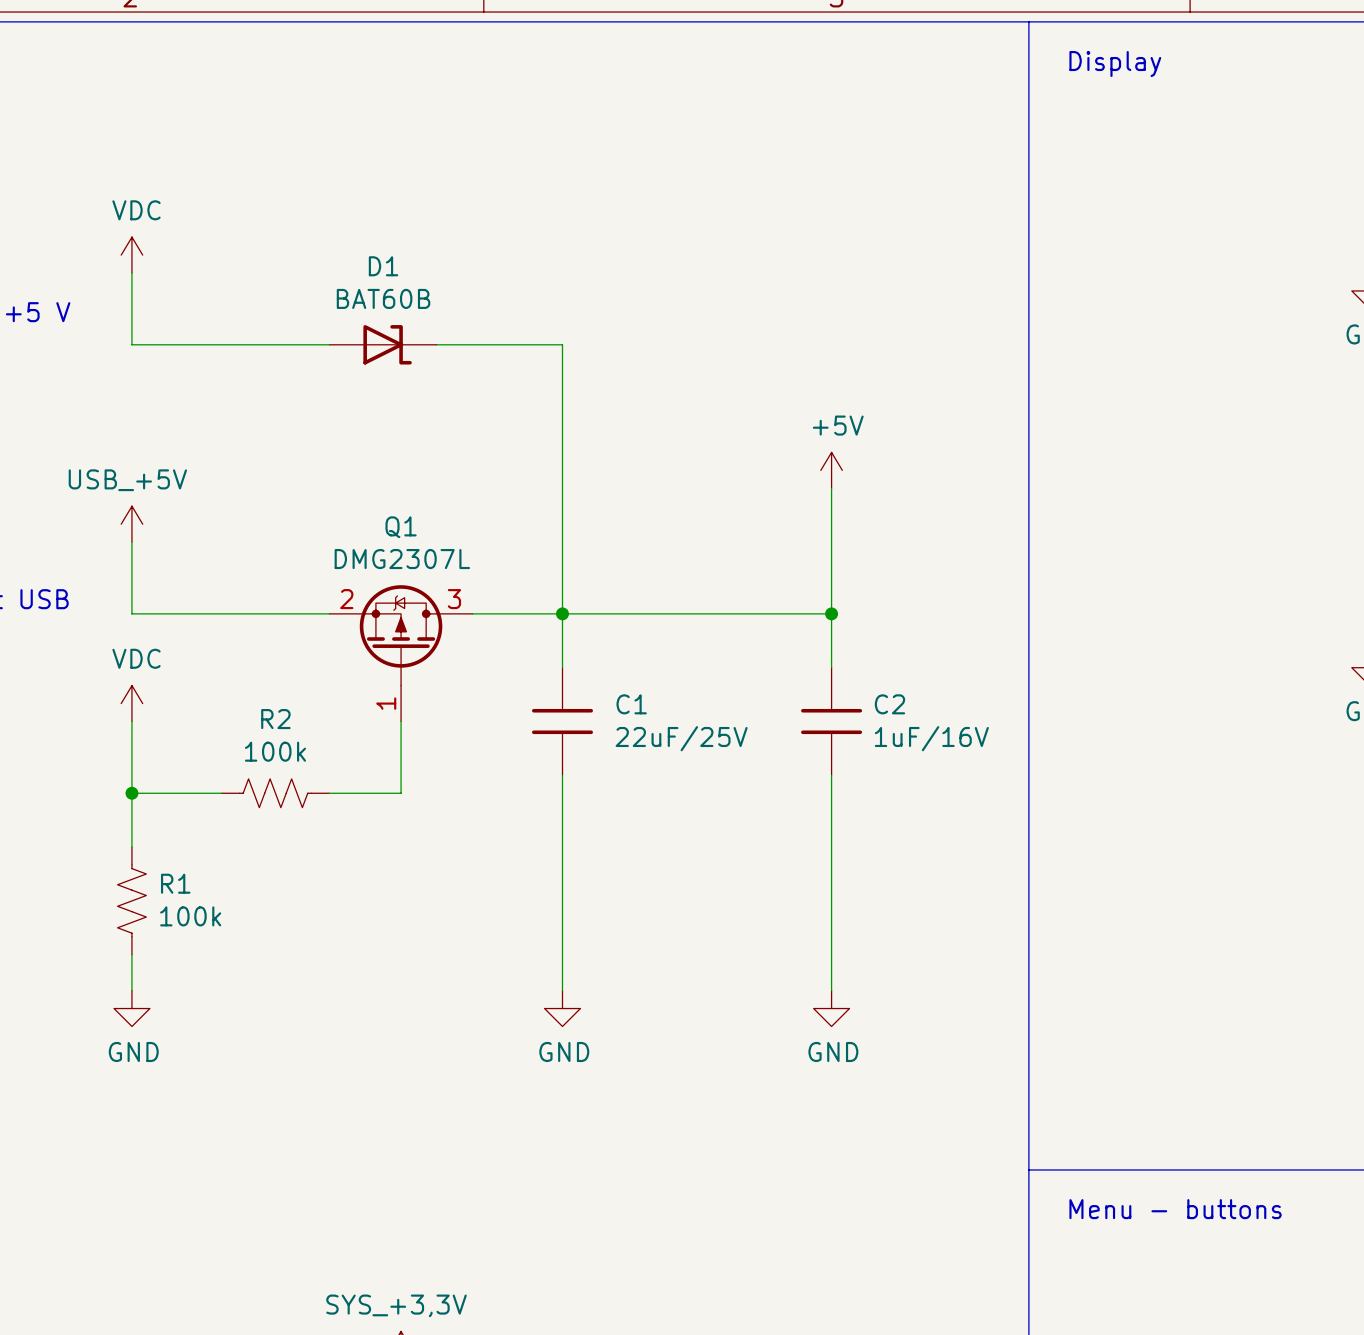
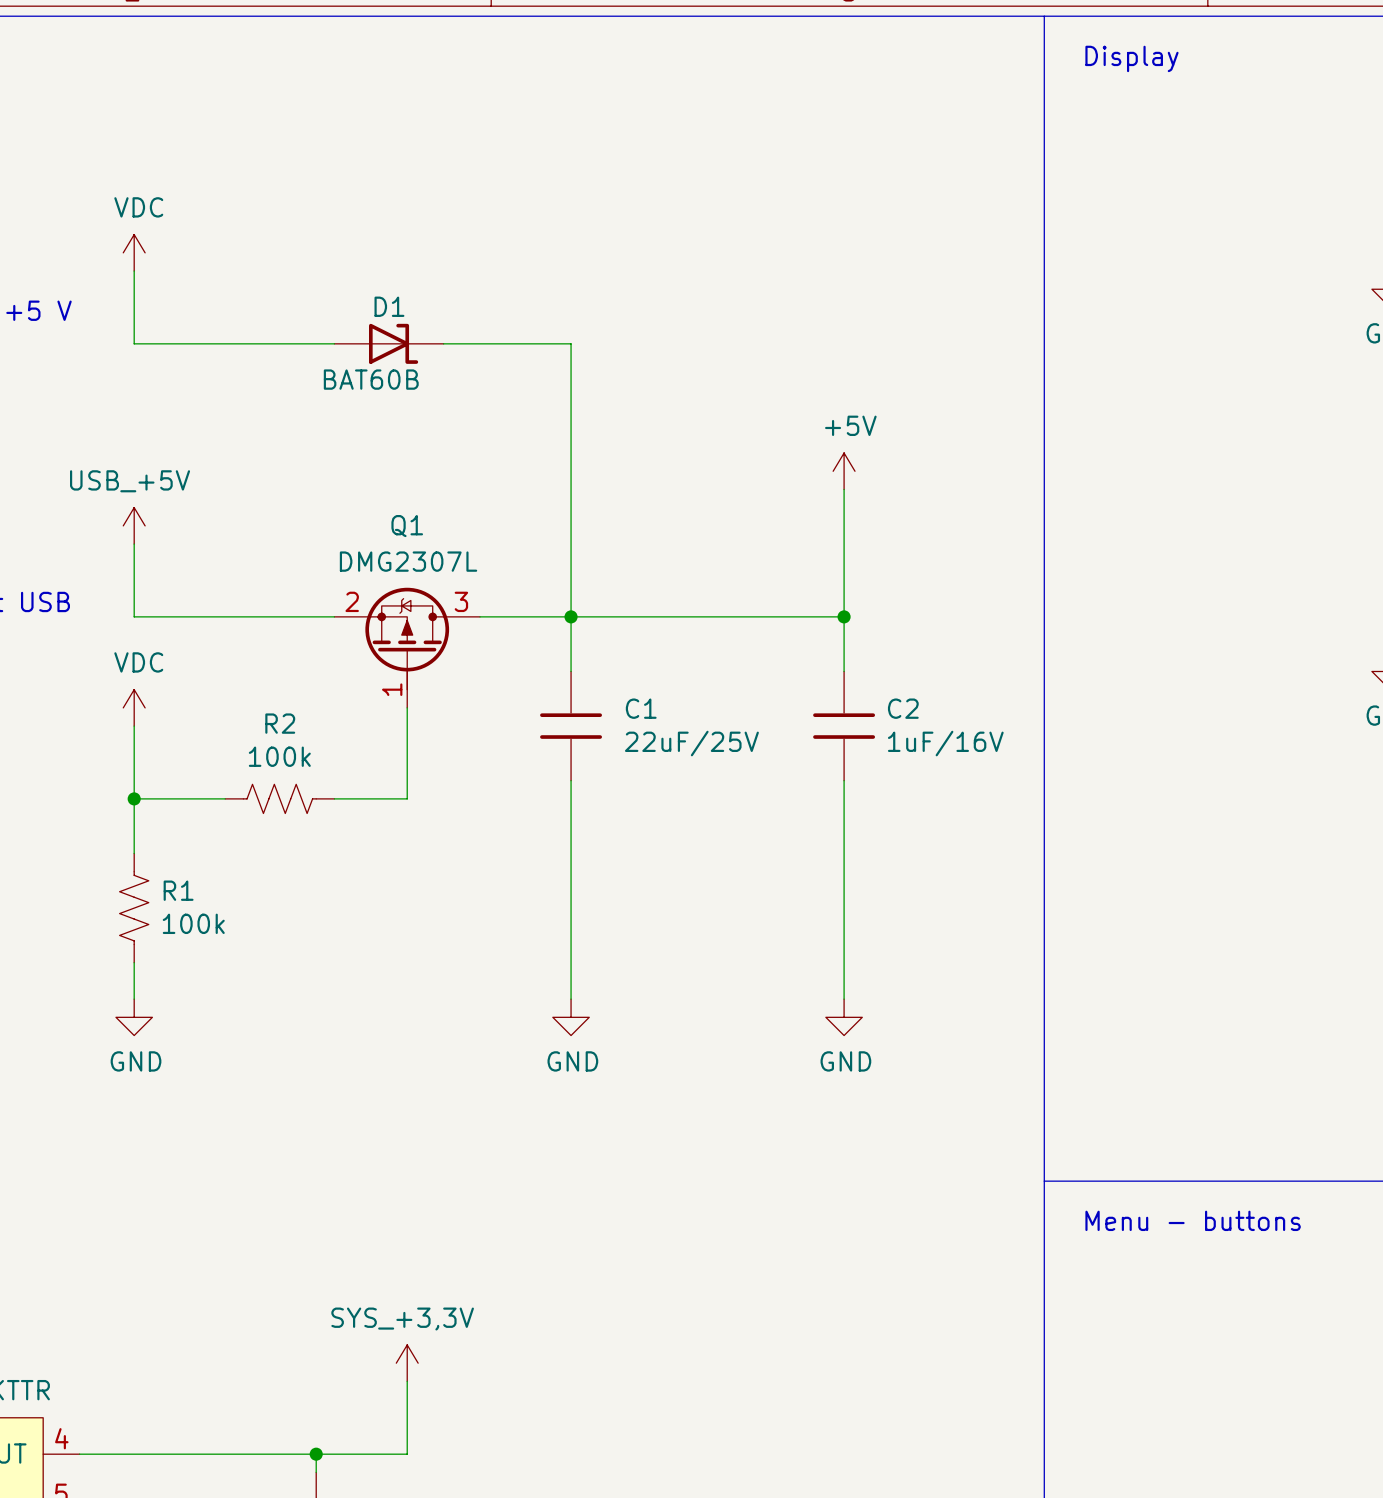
D1 name position: D1 (383, 266) -> D1 (389, 306)
D1 value position: BAT60B (383, 298) -> BAT60B (371, 379)
Q1 symbol: [329, 585, 473, 722] -> [334, 587, 481, 708]

